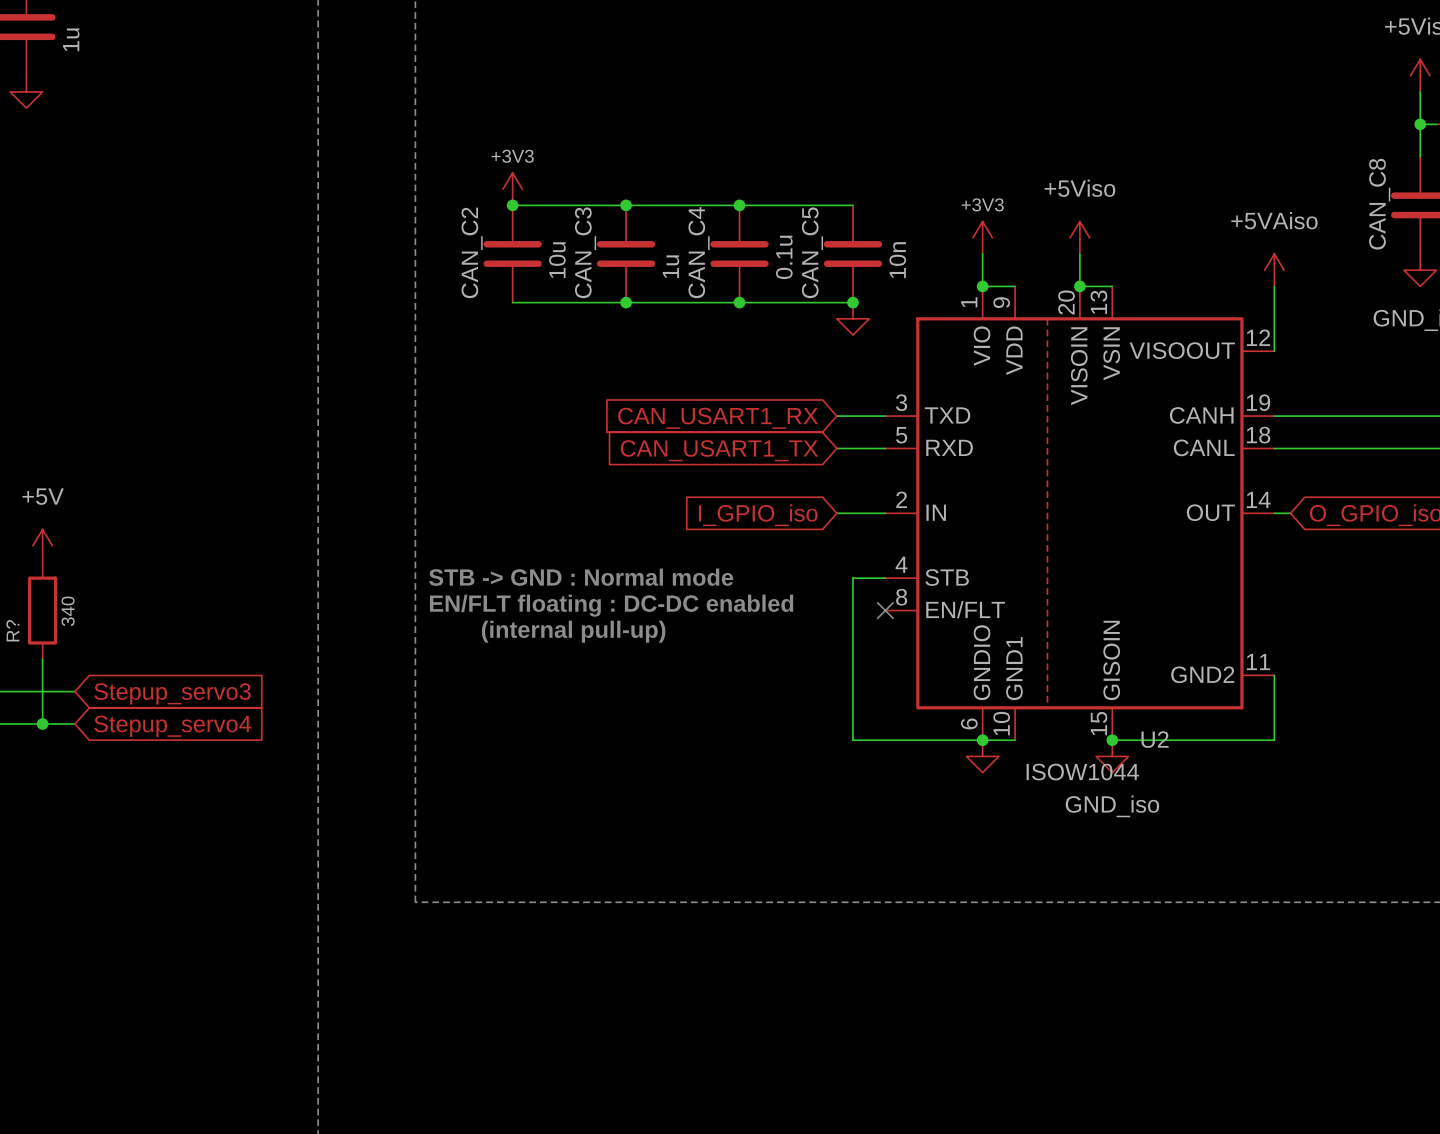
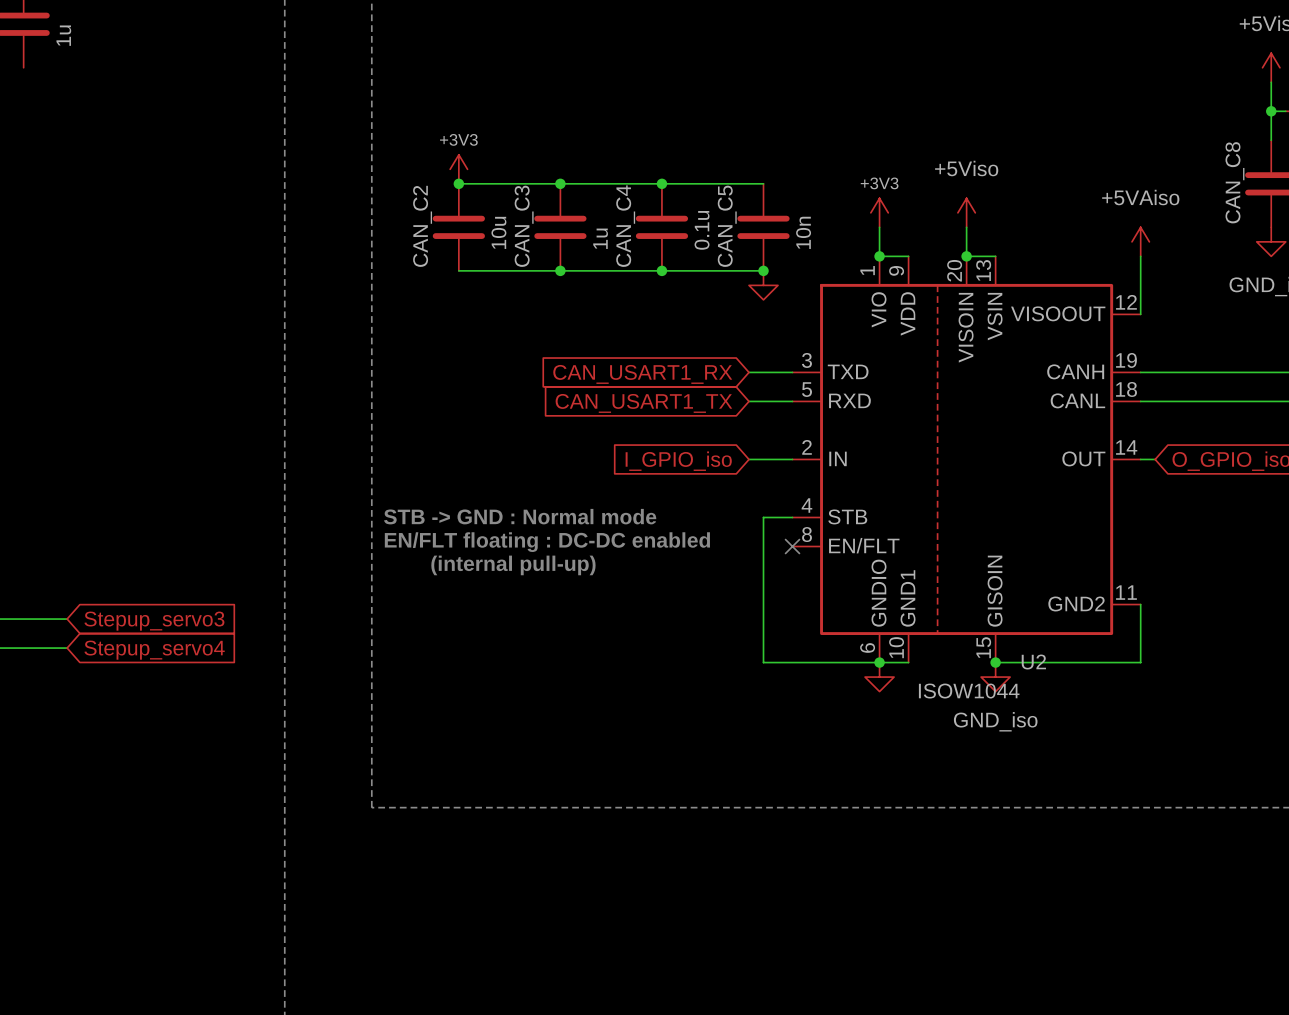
power symbol: (26, 91) -> none
power symbol: +5V (42, 545) -> none
R?: 340 (42, 610) -> none
wire: (42, 659) (42, 724) -> none
junction: (42, 724) -> none

